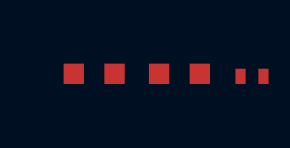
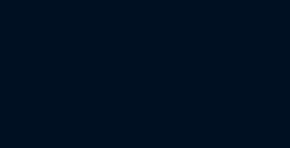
part: (94, 73) -> none
part: (179, 73) -> none
part: (251, 76) -> none

